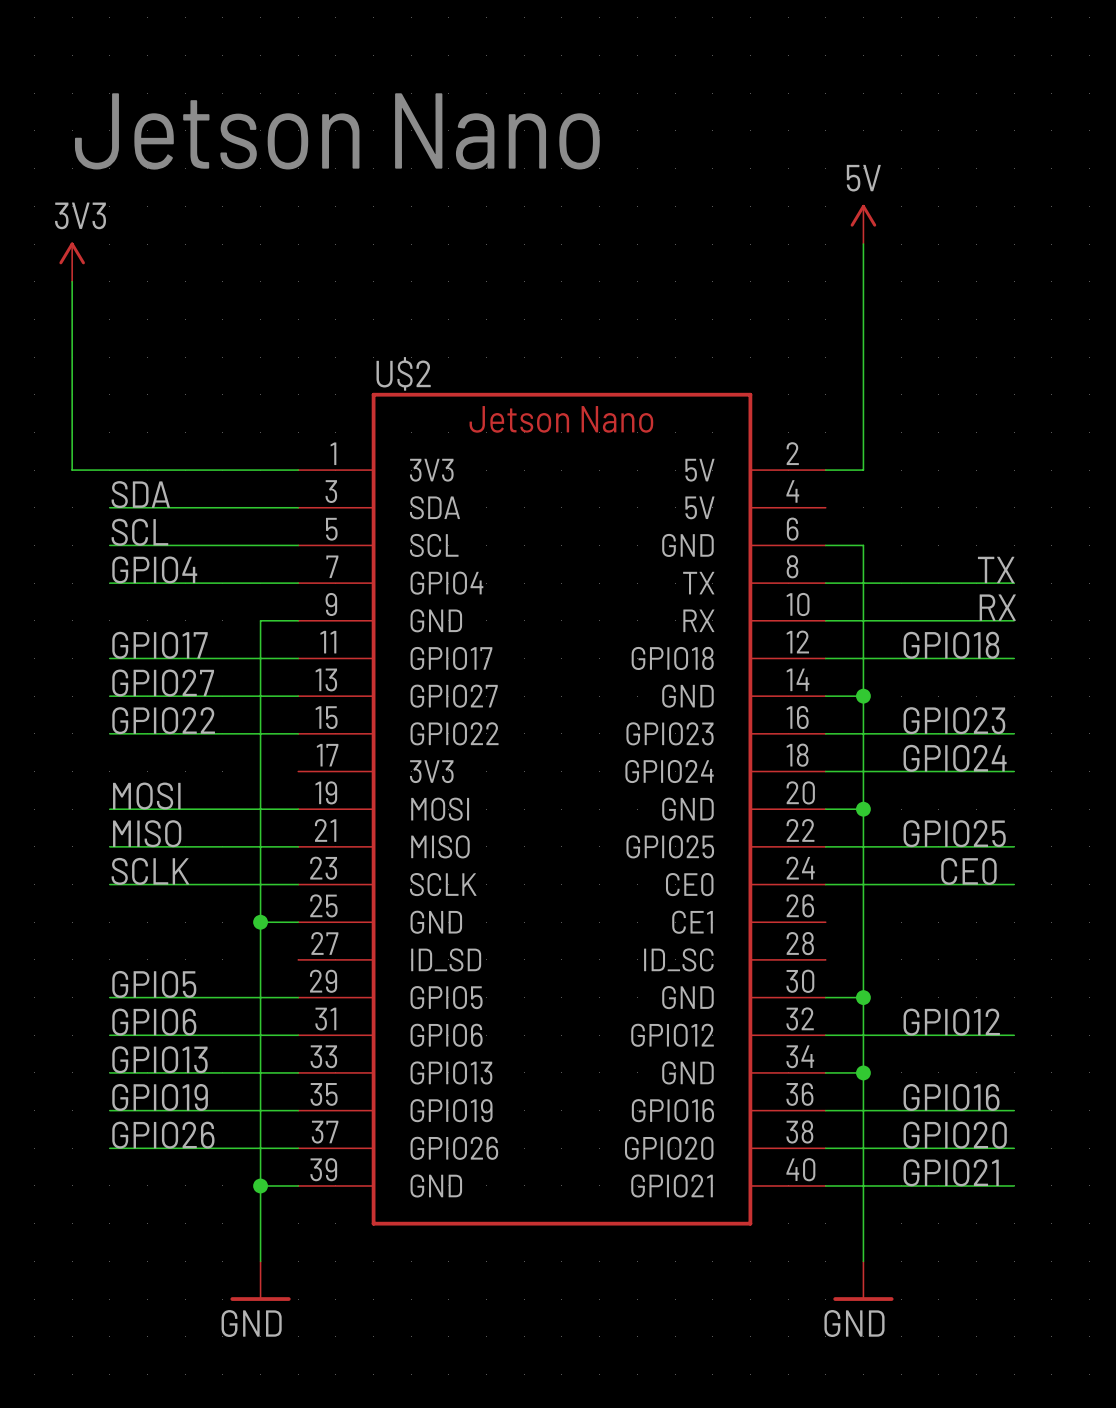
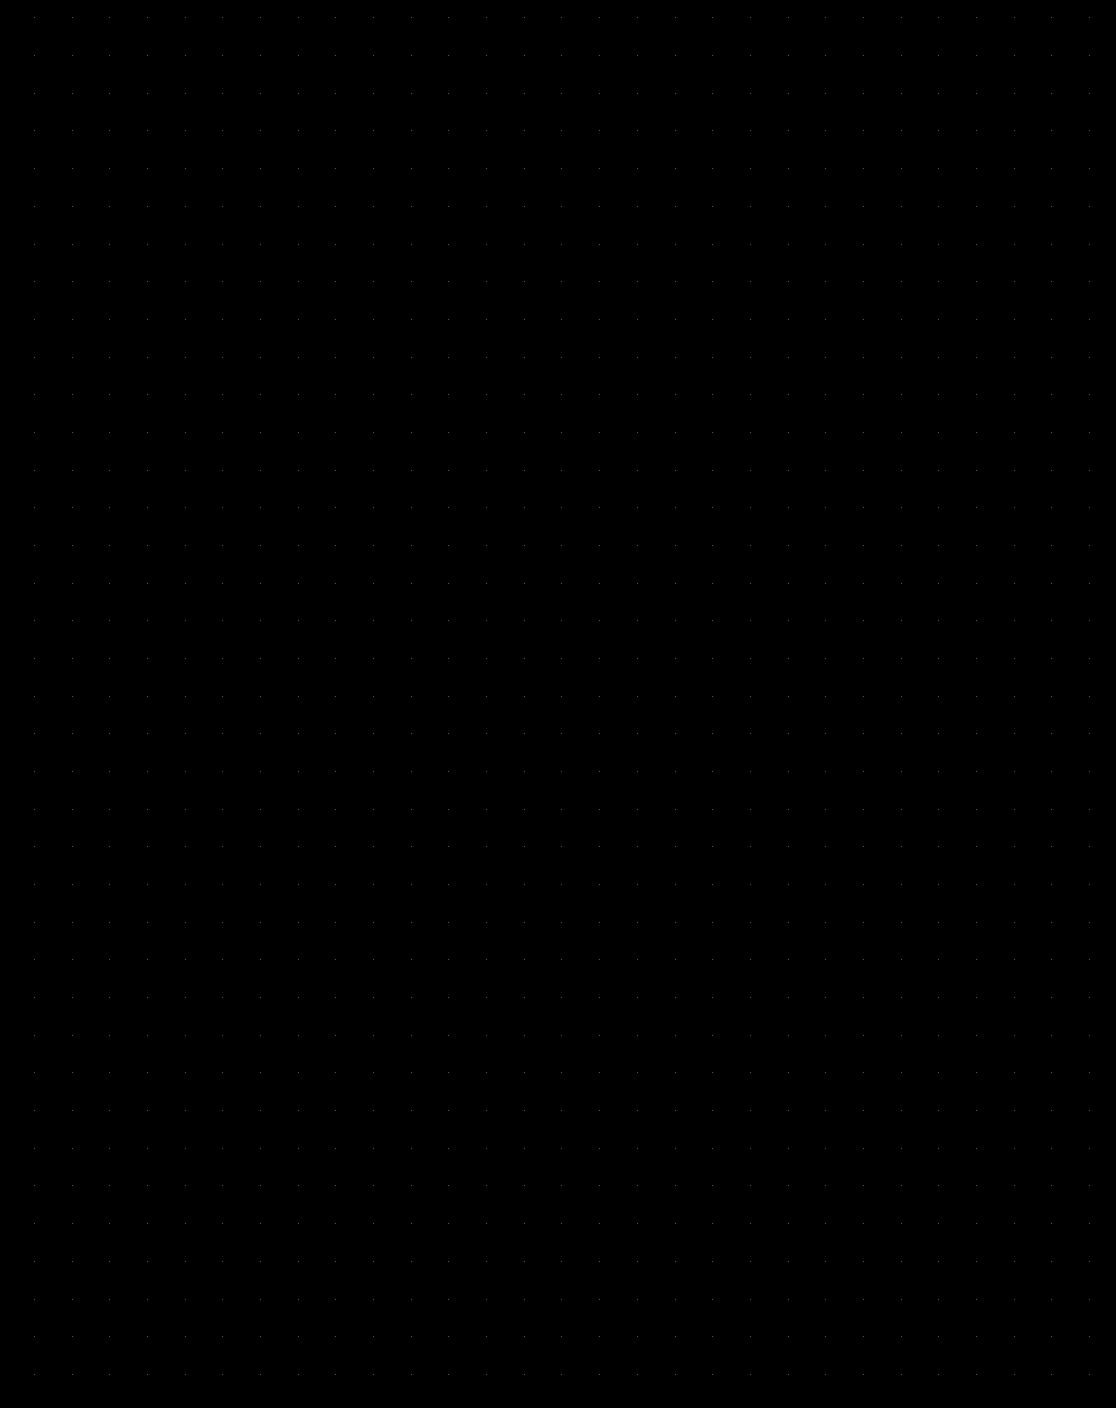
text: Jetson Nano (337, 131) -> none
power symbol: 5V (863, 224) -> none
wire: (863, 244) (863, 470) (825, 470) -> none
power symbol: 3V3 (72, 262) -> none
wire: (72, 281) (72, 470) (298, 470) -> none
label: SDA (140, 494) -> none
wire: (109, 507) (298, 507) -> none
label: SCL (139, 532) -> none
wire: (109, 545) (298, 545) -> none
wire: (825, 545) (863, 545) (863, 1261) -> none
label: GPIO4 (154, 569) -> none
label: TX (996, 569) -> none
wire: (109, 583) (298, 583) -> none
wire: (825, 583) (1014, 583) -> none
label: RX (997, 607) -> none
wire: (298, 620) (260, 620) (260, 1261) -> none
wire: (825, 620) (1014, 620) -> none
label: GPIO17 (160, 645) -> none
label: GPIO18 (951, 645) -> none
wire: (109, 658) (298, 658) -> none
wire: (825, 658) (1014, 658) -> none
label: GPIO27 (163, 682) -> none
wire: (109, 696) (298, 696) -> none
wire: (825, 696) (863, 696) -> none
junction: (863, 696) -> none
label: GPIO22 (163, 720) -> none
label: GPIO23 (954, 720) -> none
wire: (109, 733) (298, 733) -> none
wire: (825, 733) (1014, 733) -> none
label: GPIO24 (955, 758) -> none
wire: (825, 771) (1014, 771) -> none
label: MOSI (146, 796) -> none
wire: (109, 809) (298, 809) -> none
U$2: (561, 809) -> none
wire: (825, 809) (863, 809) -> none
junction: (863, 809) -> none
label: MISO (147, 833) -> none
label: GPIO25 (954, 833) -> none
wire: (109, 846) (298, 846) -> none
wire: (825, 846) (1014, 846) -> none
label: SCLK (150, 871) -> none
label: CE0 (968, 871) -> none
wire: (109, 884) (298, 884) -> none
wire: (825, 884) (1014, 884) -> none
wire: (260, 922) (298, 922) -> none
junction: (260, 922) -> none
label: GPIO5 (154, 984) -> none
wire: (109, 997) (298, 997) -> none
wire: (825, 997) (863, 997) -> none
junction: (863, 997) -> none
label: GPIO6 (154, 1022) -> none
label: GPIO12 (951, 1022) -> none
wire: (109, 1035) (298, 1035) -> none
wire: (825, 1035) (1014, 1035) -> none
label: GPIO13 (159, 1059) -> none
wire: (109, 1072) (298, 1072) -> none
wire: (825, 1072) (863, 1072) -> none
junction: (863, 1072) -> none
label: GPIO19 (160, 1097) -> none
label: GPIO16 (951, 1097) -> none
wire: (109, 1110) (298, 1110) -> none
wire: (825, 1110) (1014, 1110) -> none
label: GPIO26 (163, 1135) -> none
label: GPIO20 (955, 1135) -> none
wire: (109, 1148) (298, 1148) -> none
wire: (825, 1148) (1014, 1148) -> none
label: GPIO21 (951, 1172) -> none
wire: (260, 1185) (298, 1185) -> none
junction: (260, 1185) -> none
wire: (825, 1185) (1014, 1185) -> none
power symbol: GND (260, 1281) -> none
power symbol: GND (863, 1281) -> none

